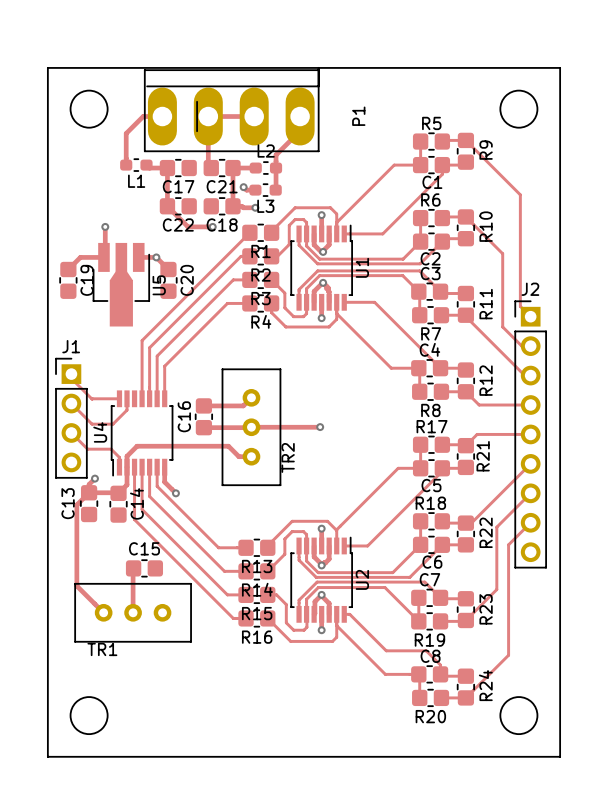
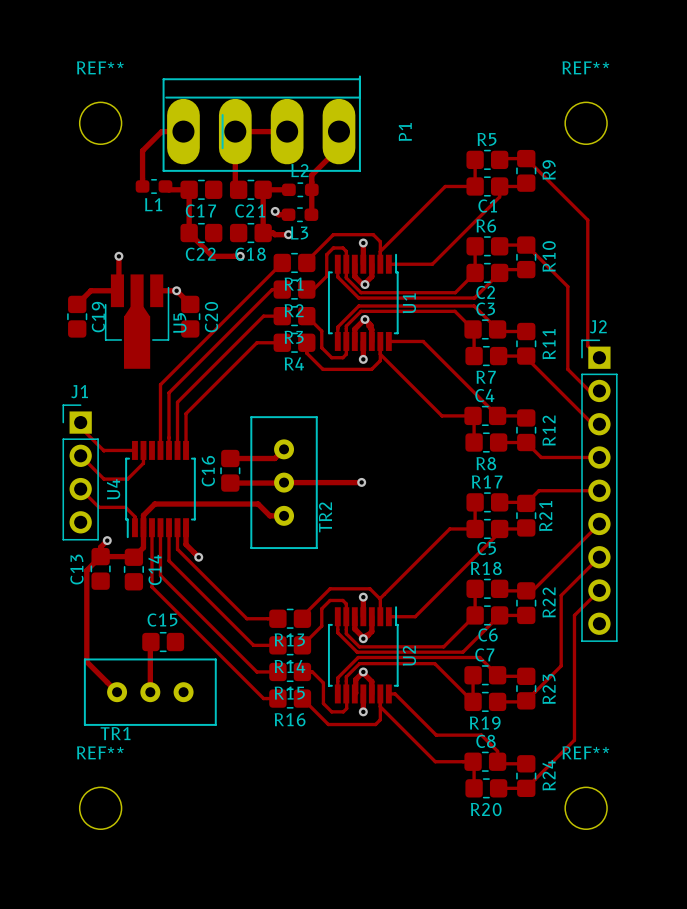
REF** name: none -> REF** (100, 67)
REF** name: none -> REF** (585, 67)
board edge: (47, 67) (560, 67) (560, 756) (47, 756) (47, 67) -> none
REF** name: none -> REF** (100, 752)
REF** name: none -> REF** (585, 752)

